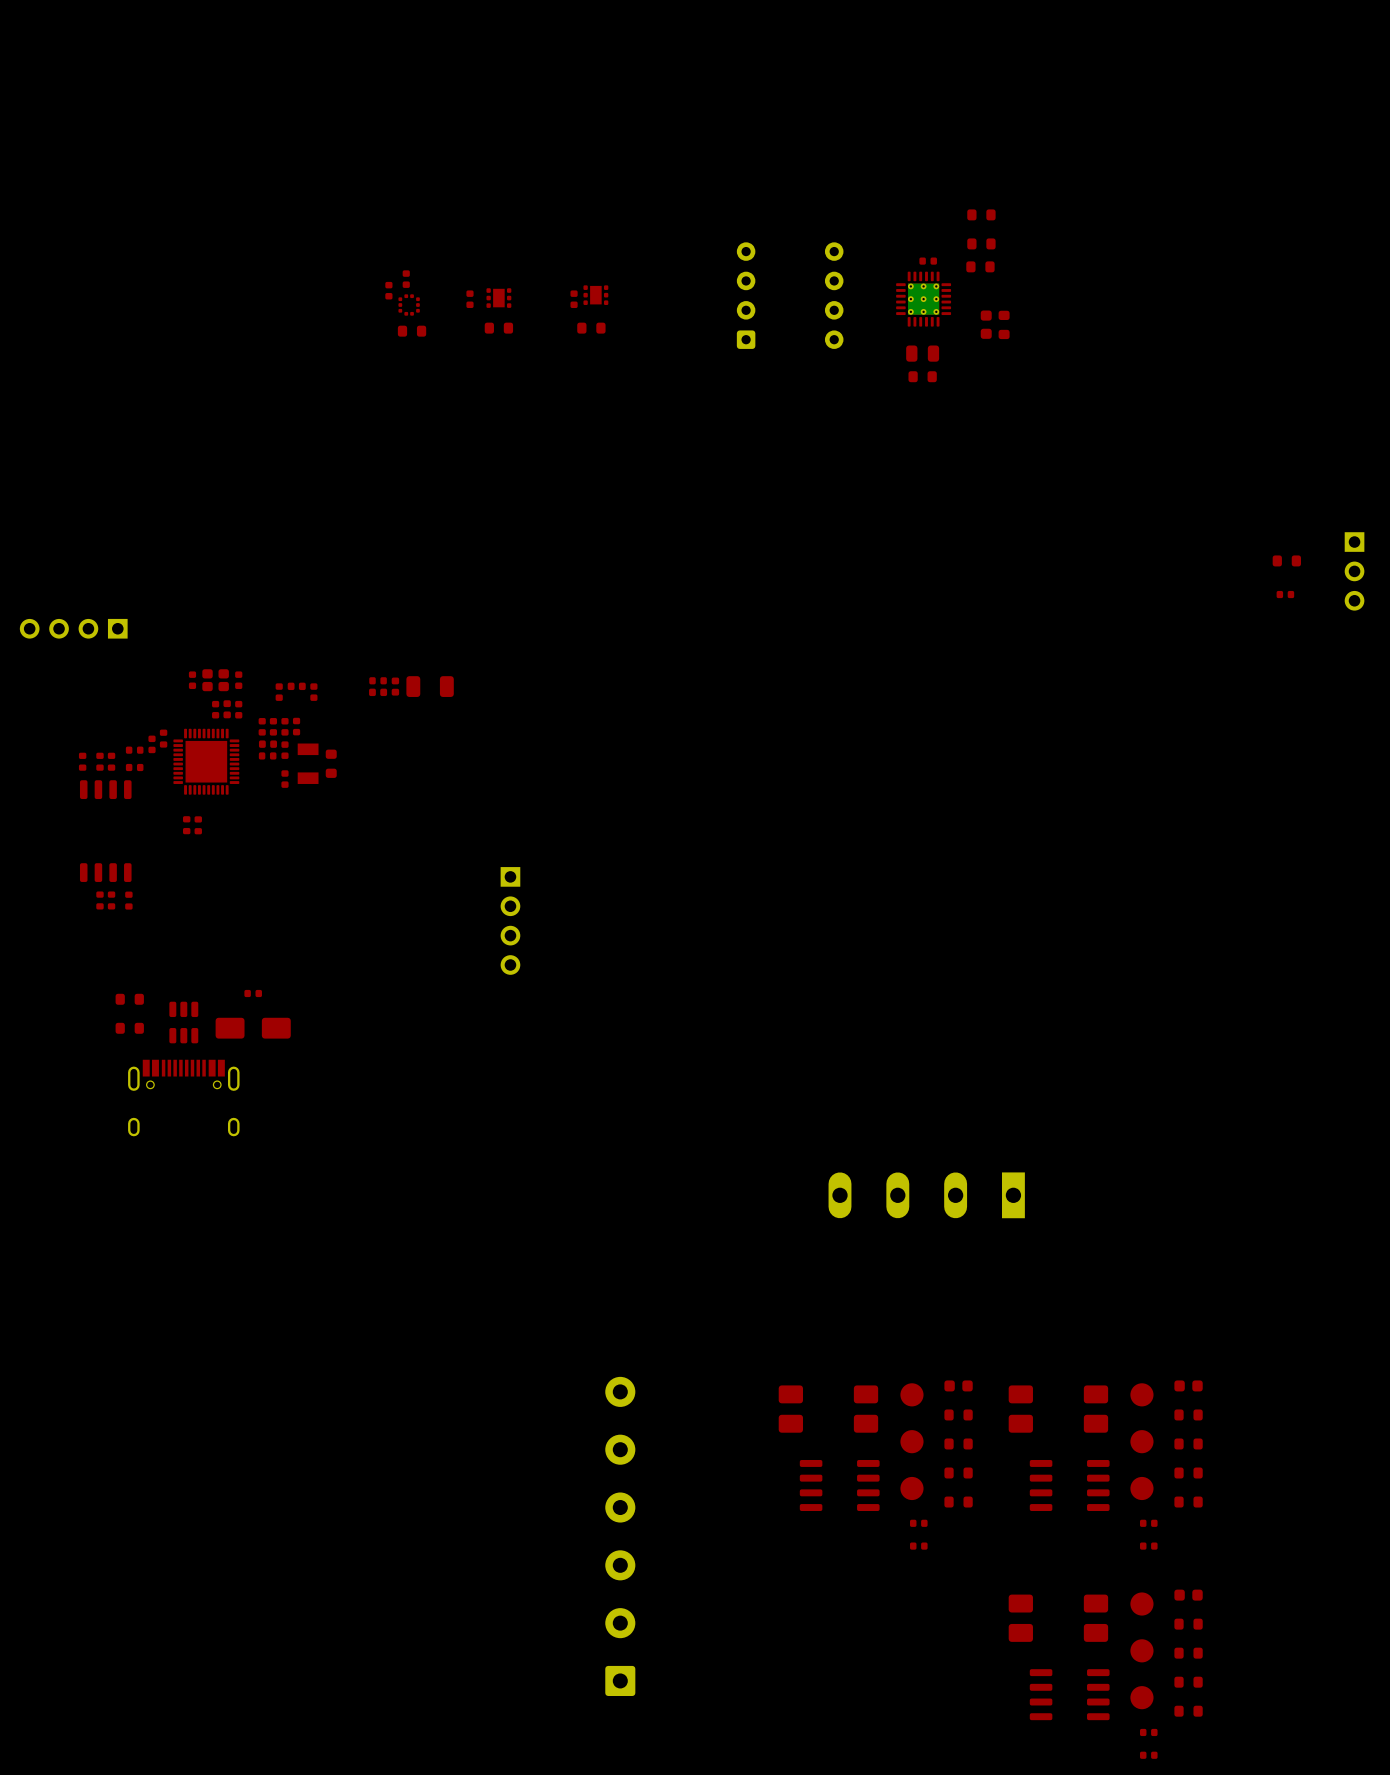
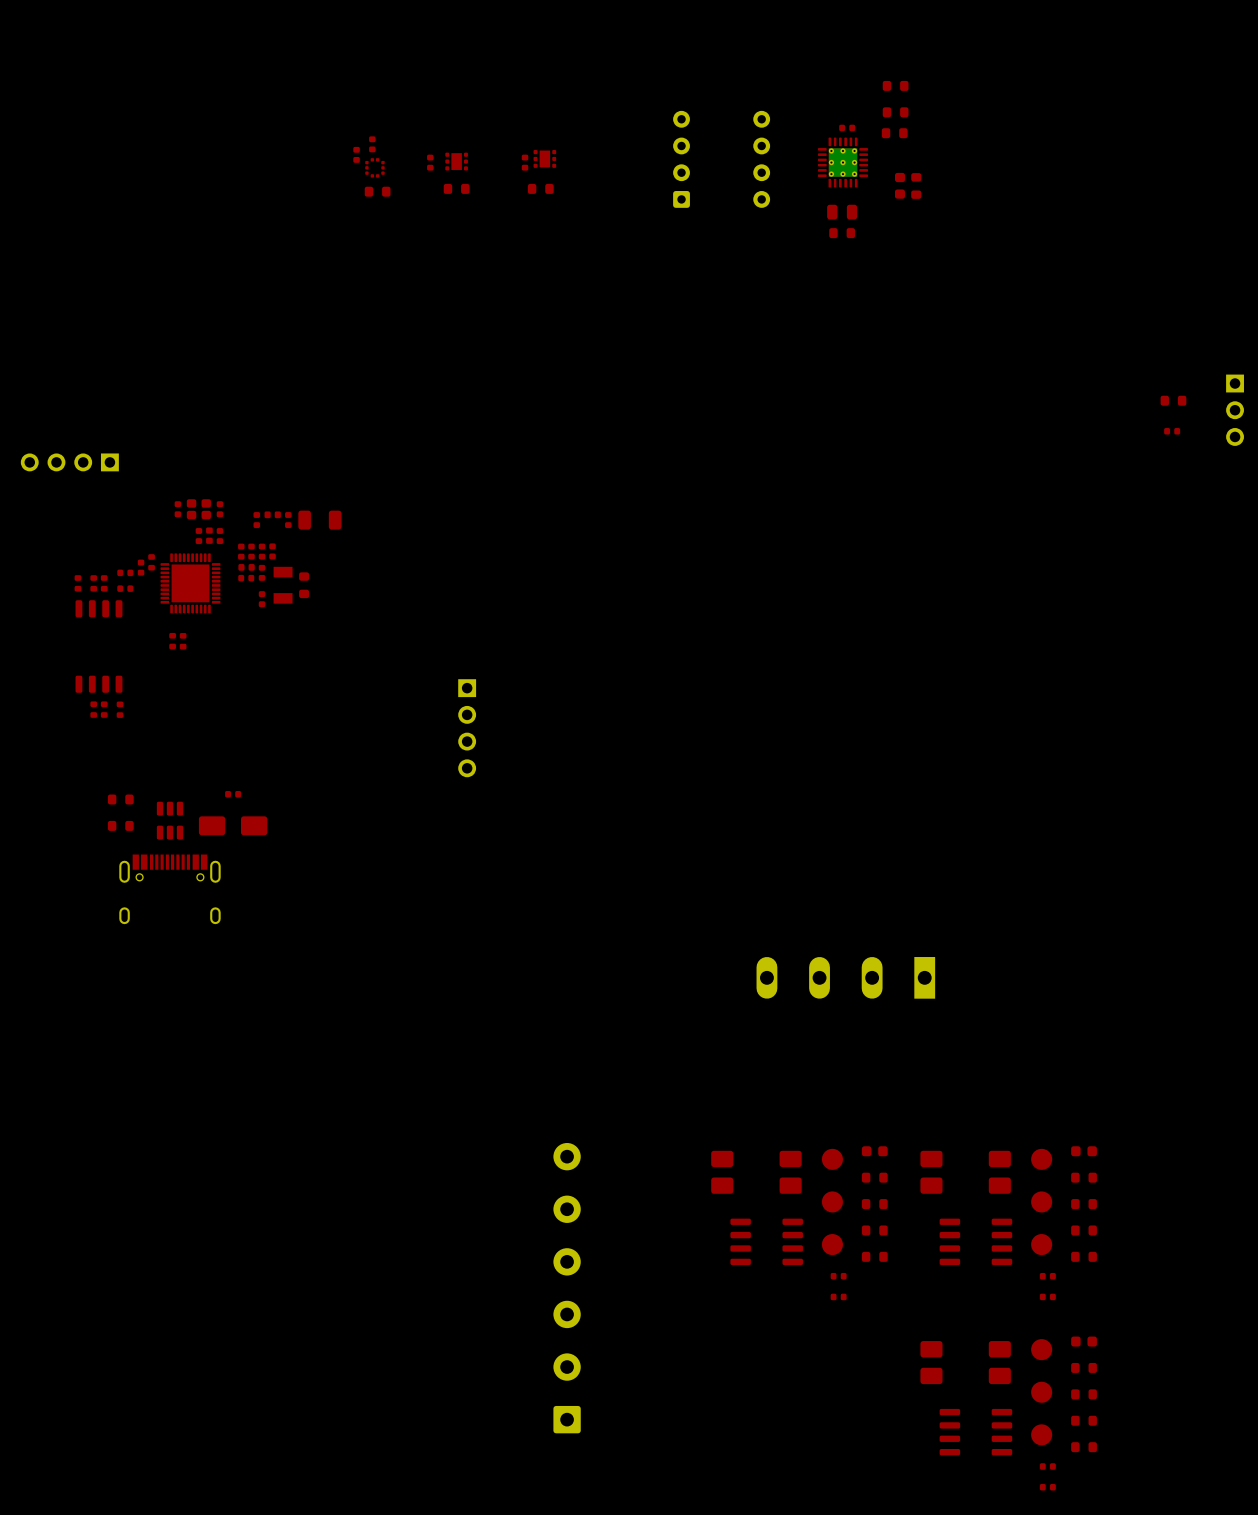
part: (378, 680) -> none
part: (395, 686) -> none
part position: (430, 686) -> (319, 520)
part: (378, 692) -> none

